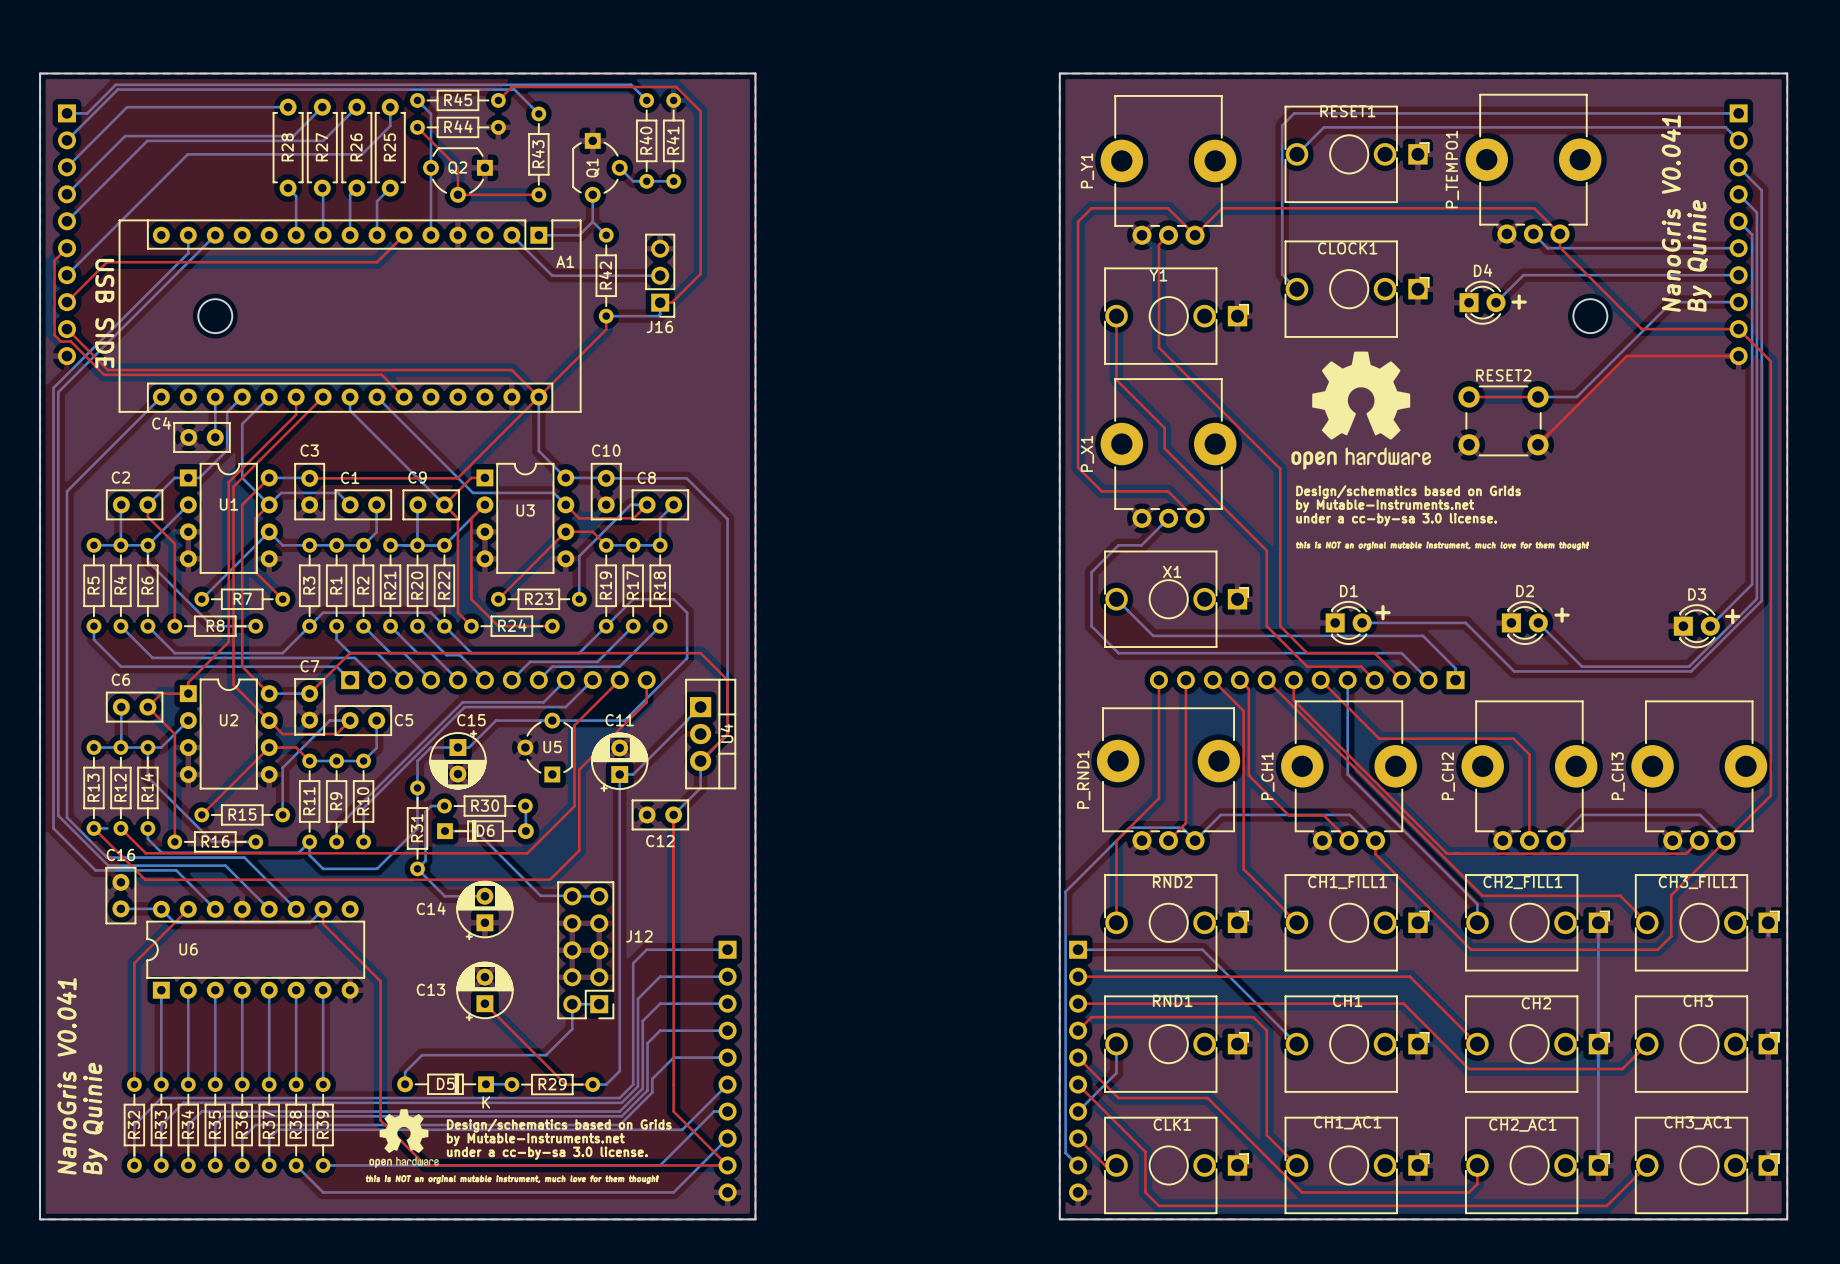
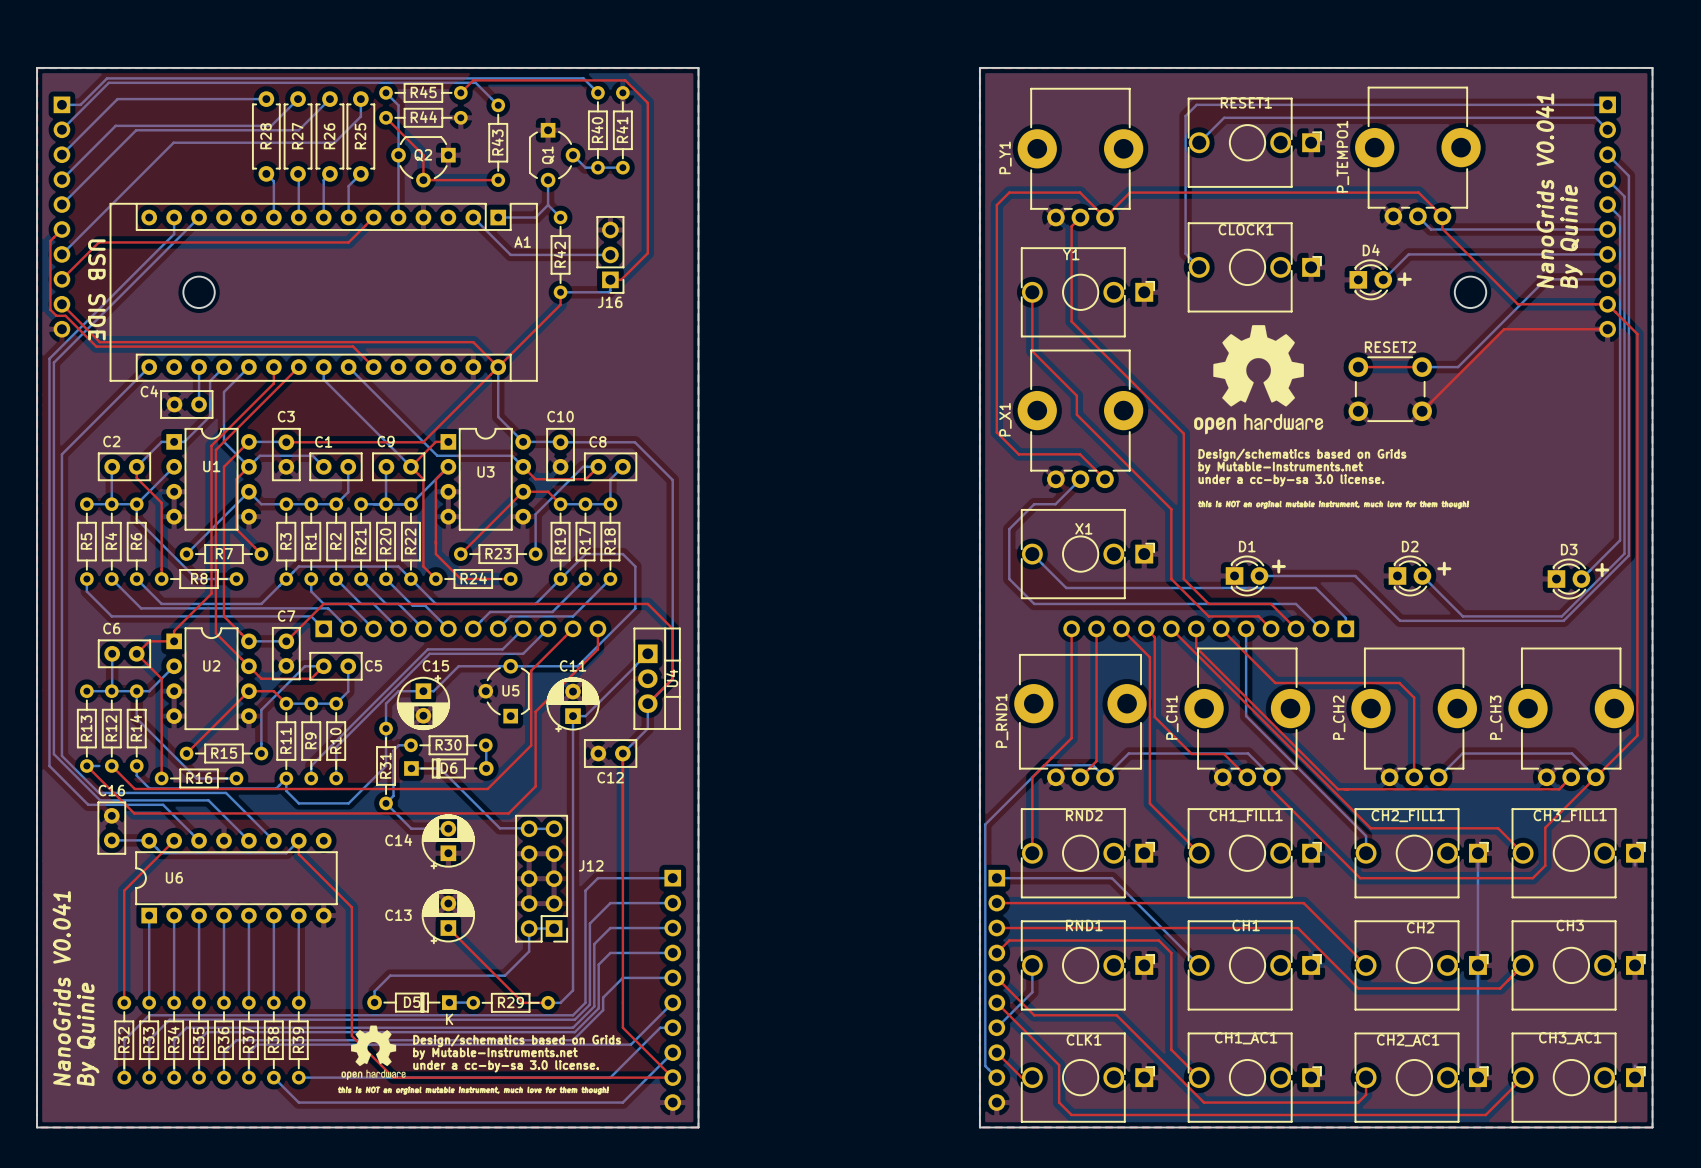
text: NanoGris V0.041 (1670, 213) -> NanoGrids V0.041 (1545, 190)
text: NanoGris V0.041 (66, 1076) -> NanoGrids V0.041 (61, 988)

